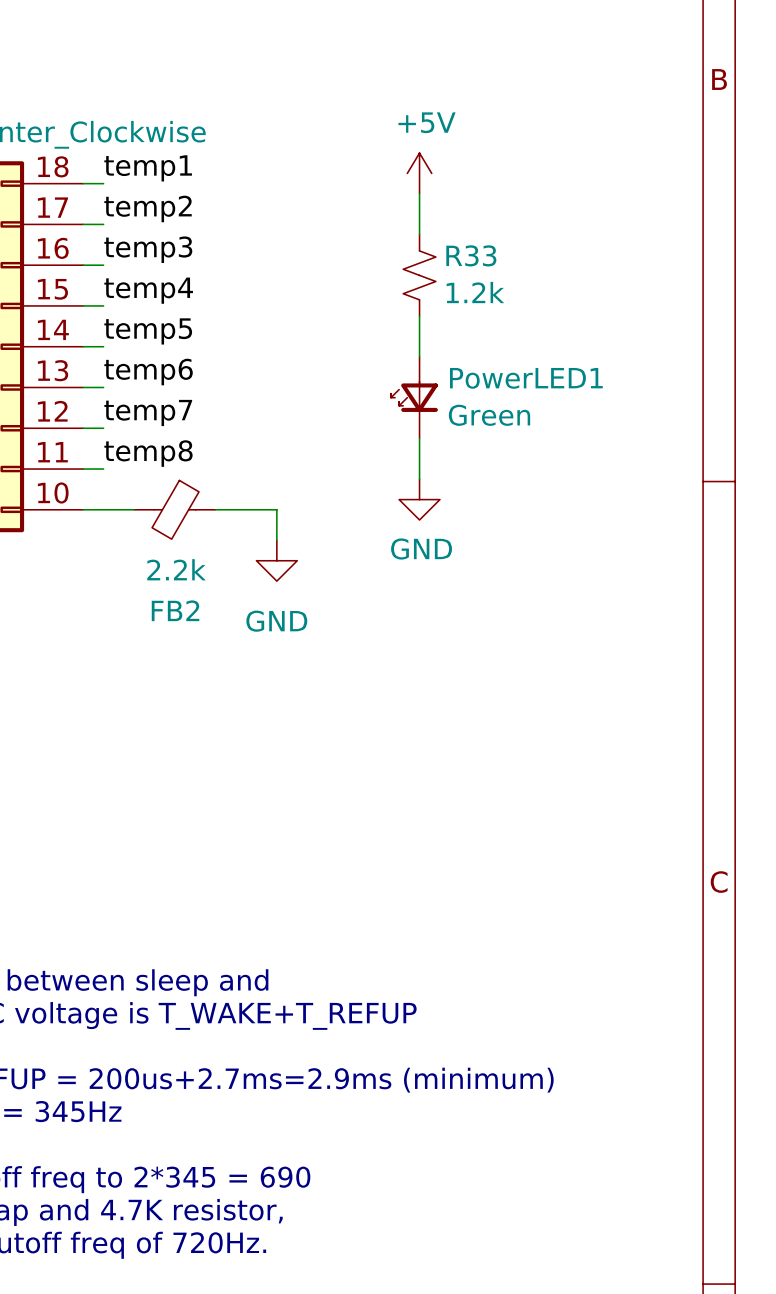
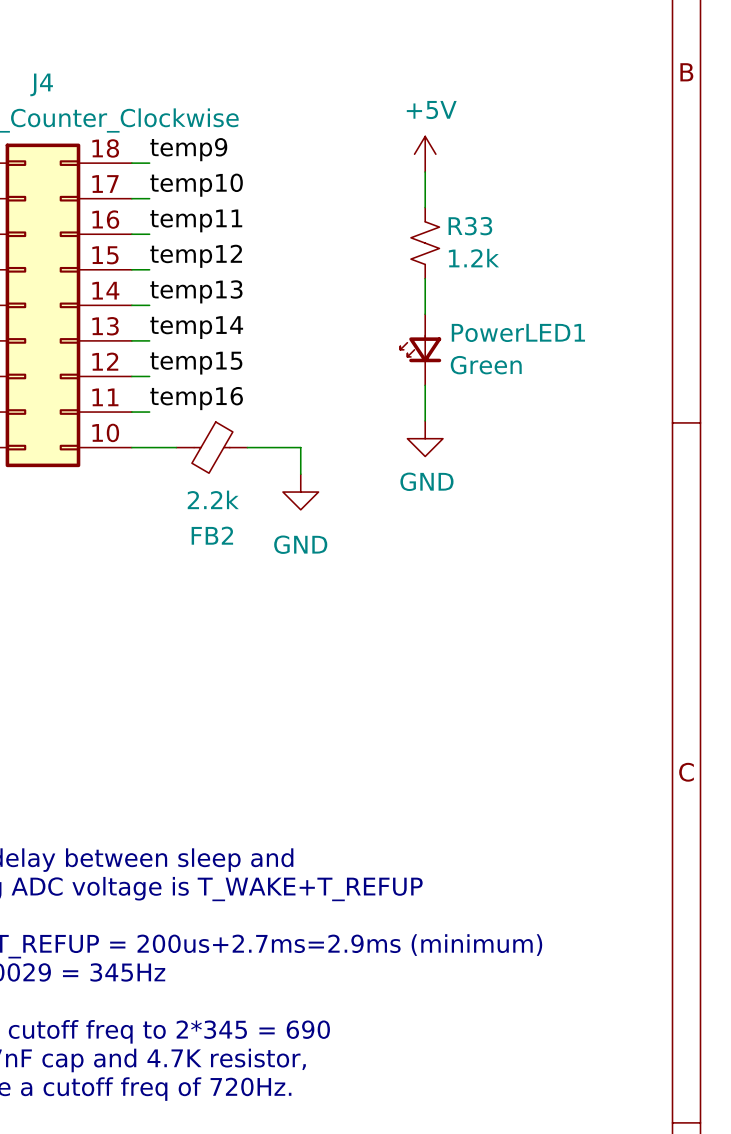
label: temp1 (148, 168) -> temp9 (188, 149)
label: temp2 (148, 208) -> temp10 (196, 185)
label: temp3 (148, 249) -> temp11 (196, 220)
label: temp4 (148, 290) -> temp12 (196, 256)
label: temp5 (148, 331) -> temp13 (196, 291)
label: temp6 (148, 372) -> temp14 (196, 327)
label: temp7 (148, 412) -> temp15 (196, 363)
label: temp8 (148, 453) -> temp16 (196, 398)

